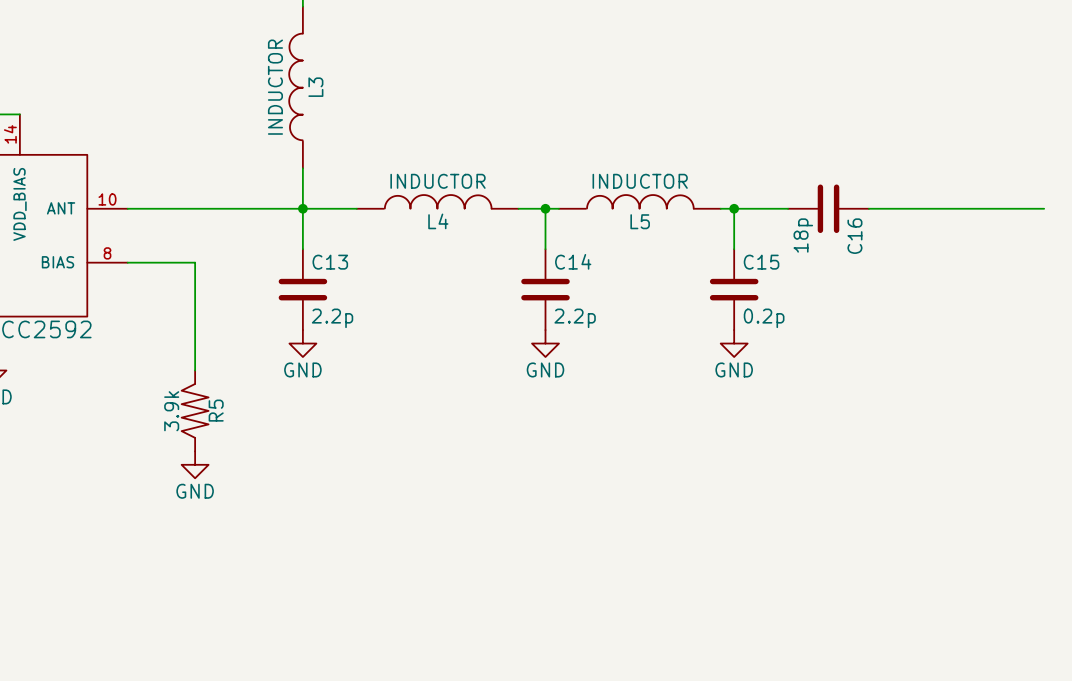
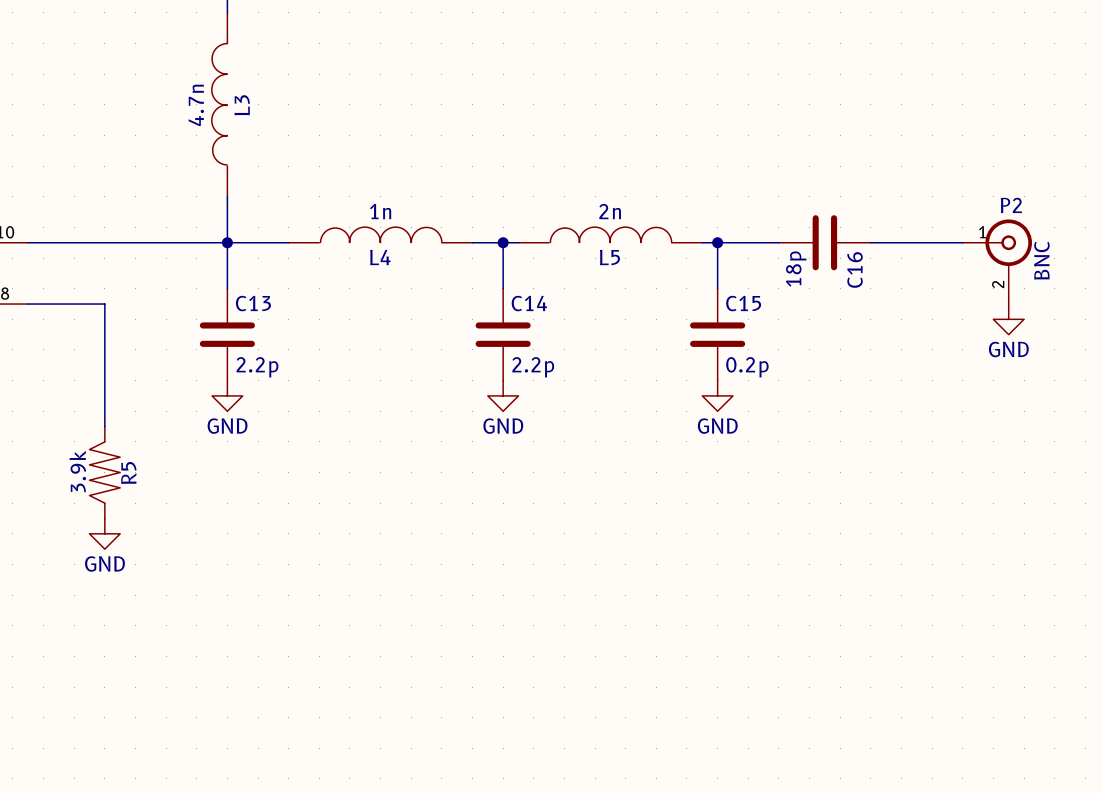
L3 value: INDUCTOR (275, 87) -> 4.7n (196, 105)
L4 value: INDUCTOR (438, 181) -> 1n (380, 211)
L5 value: INDUCTOR (640, 181) -> 2n (610, 211)
wire: (949, 208) (1044, 208) -> none
P2: none -> BNC (997, 261)
power symbol: none -> GND (1008, 319)

